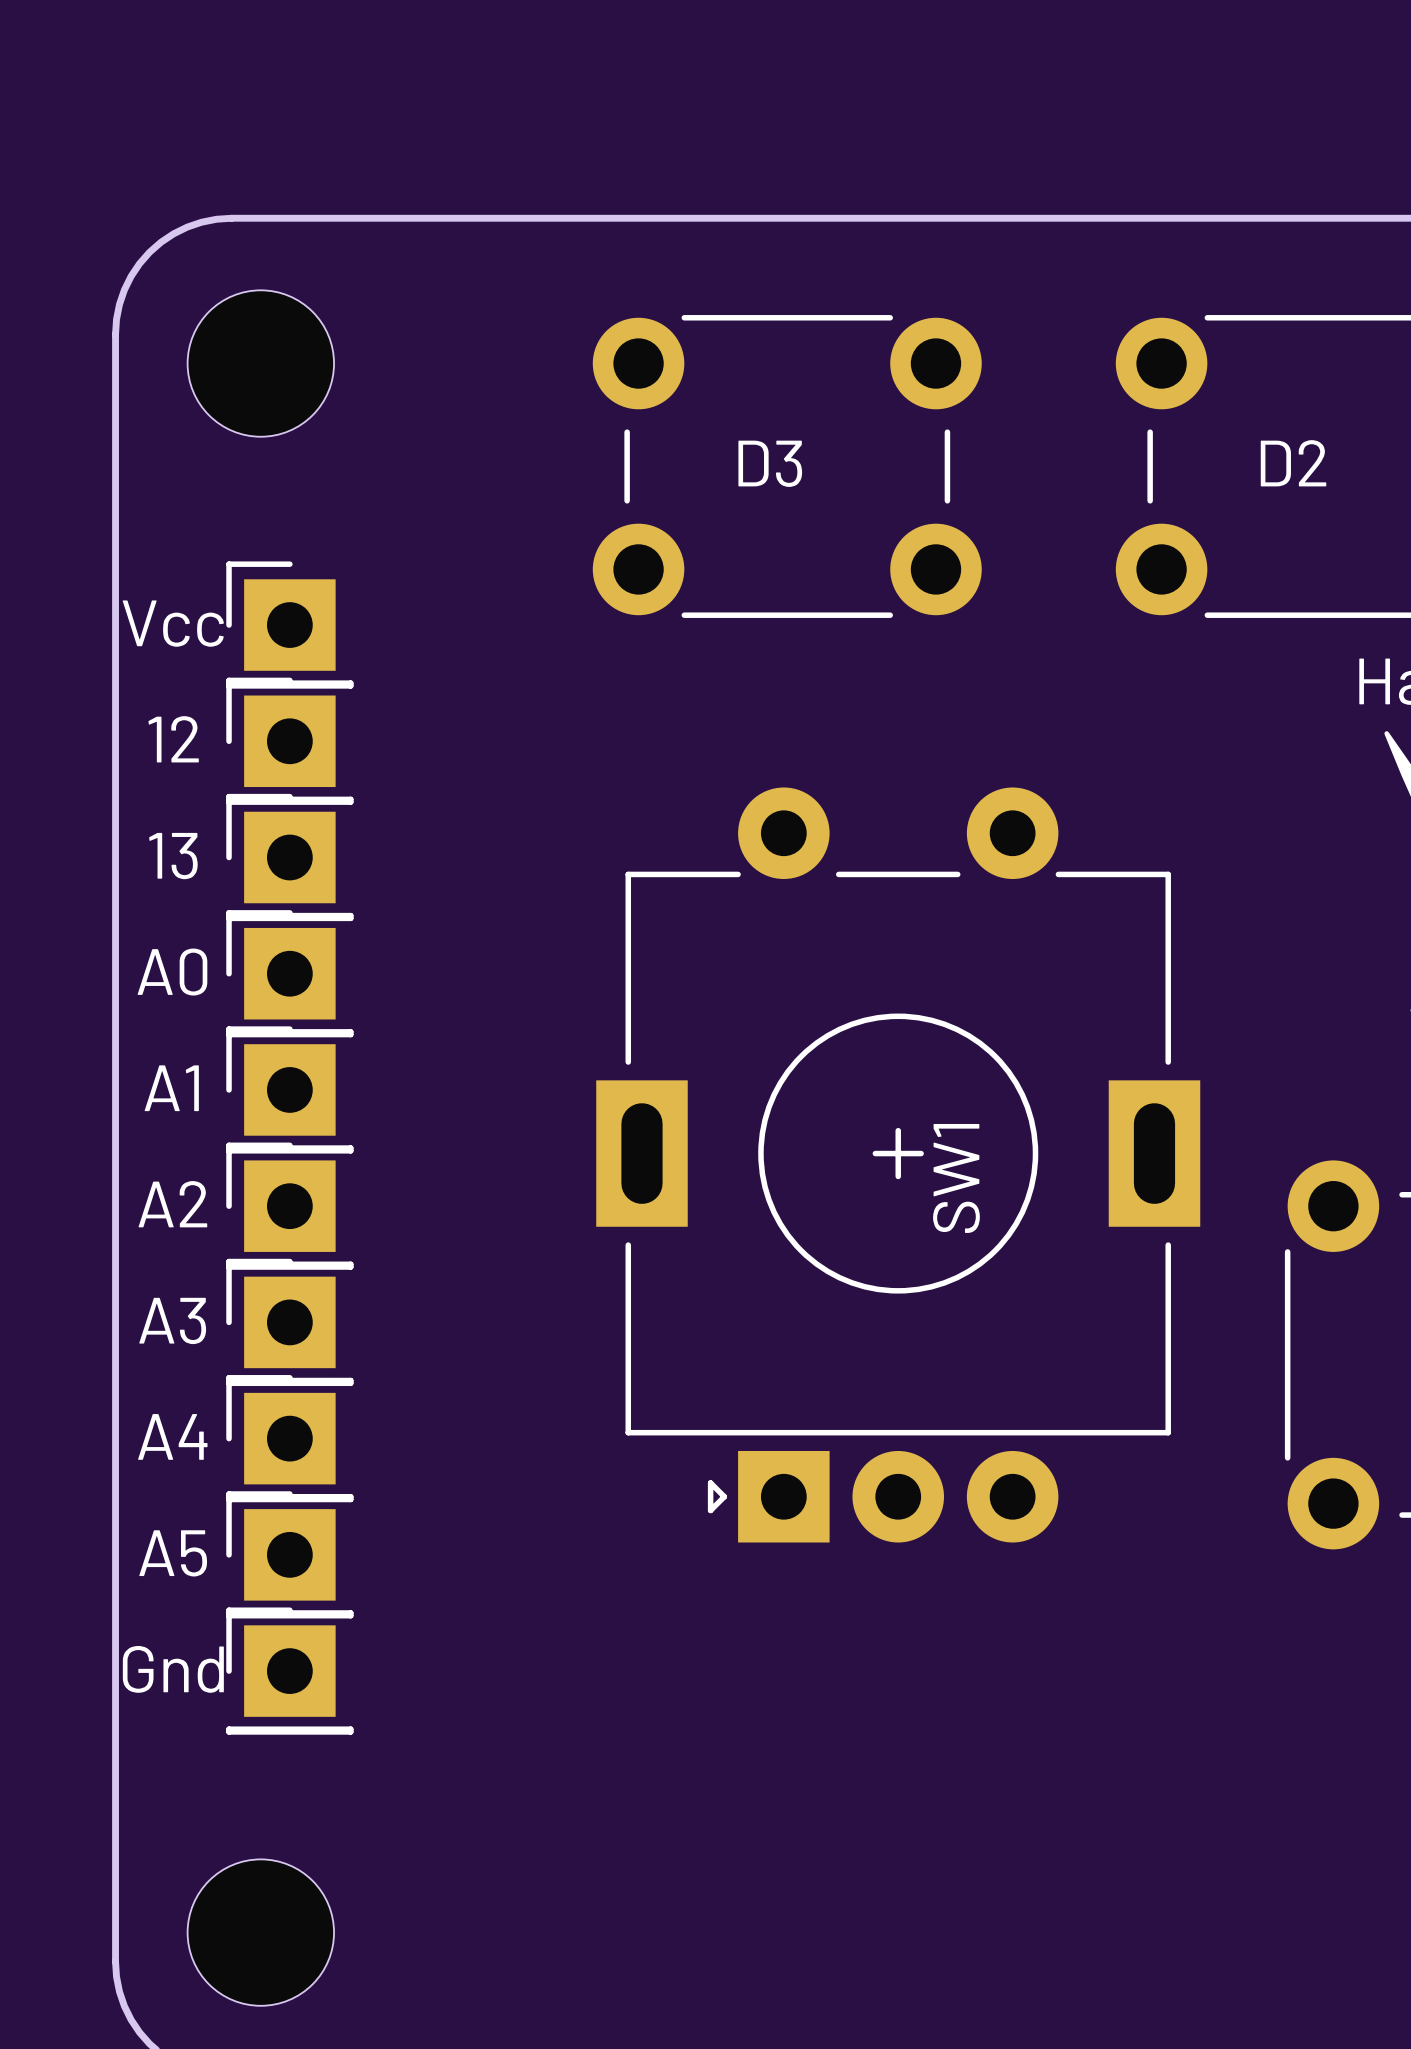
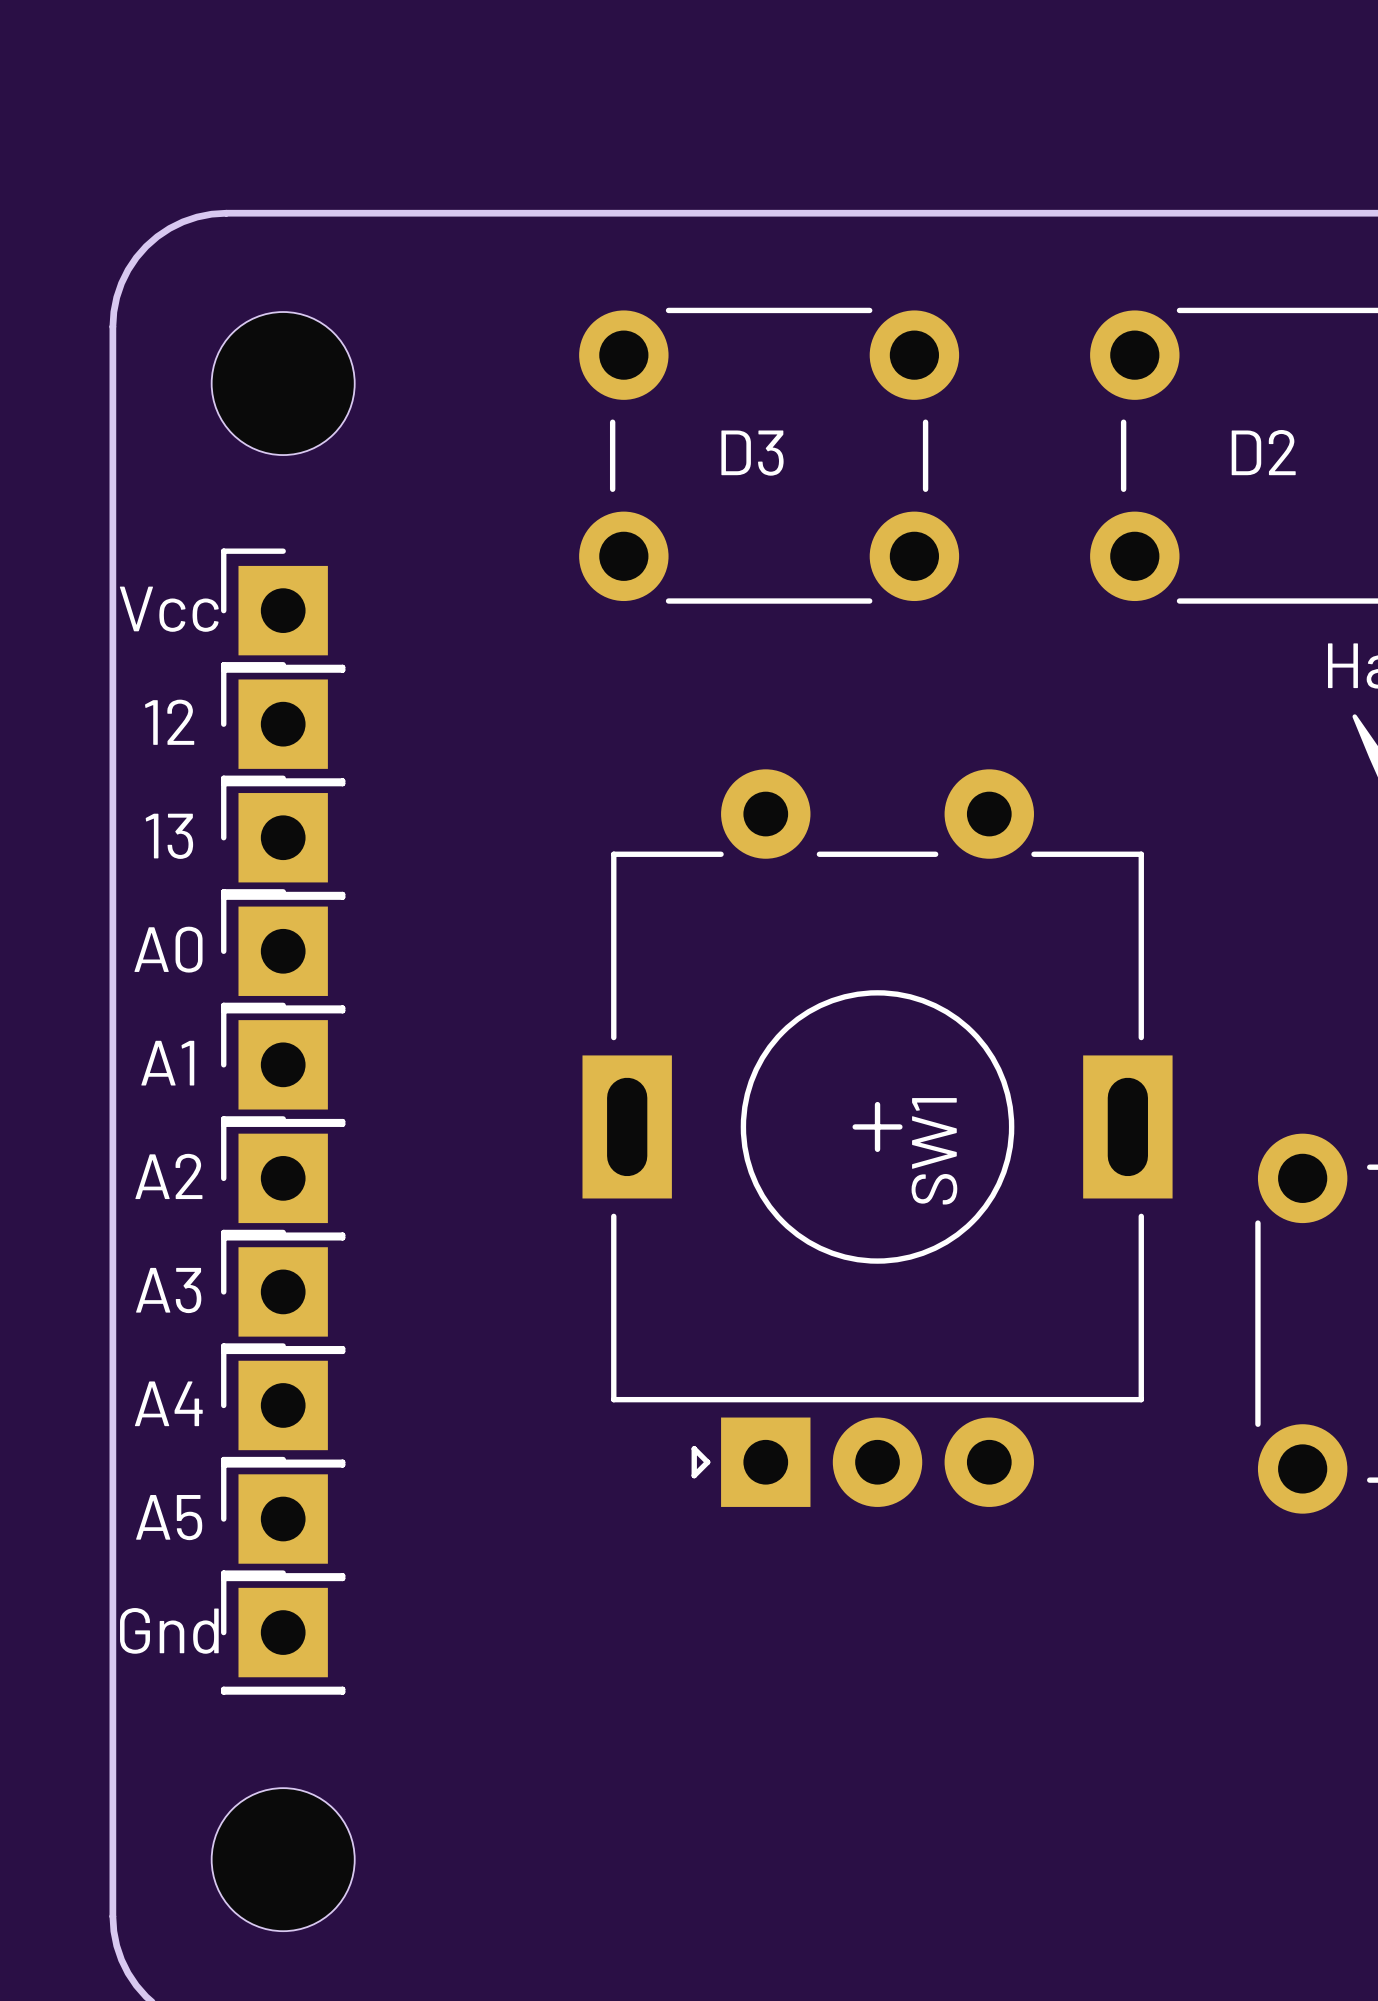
part position: (260, 363) -> (283, 383)
part position: (260, 1932) -> (283, 1859)

